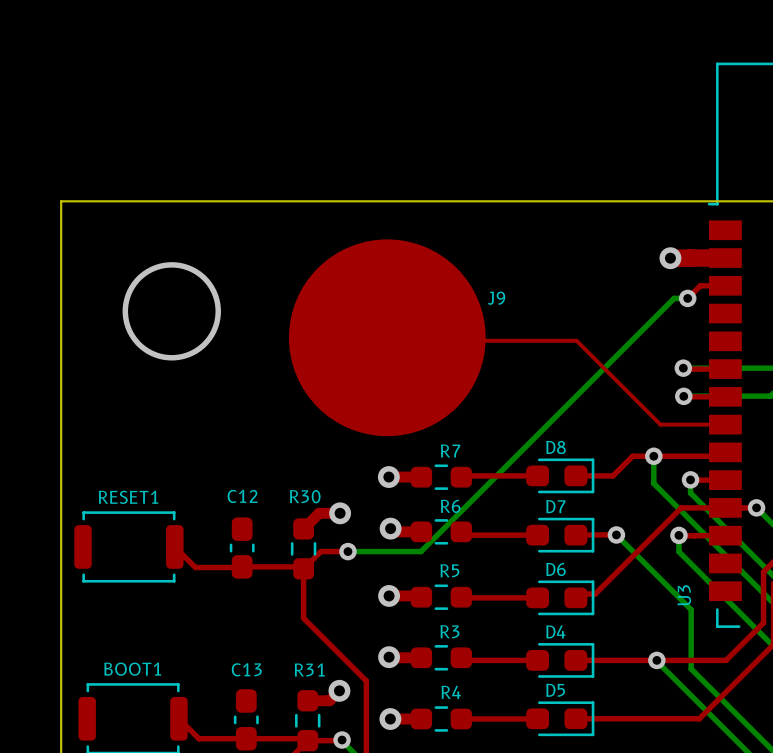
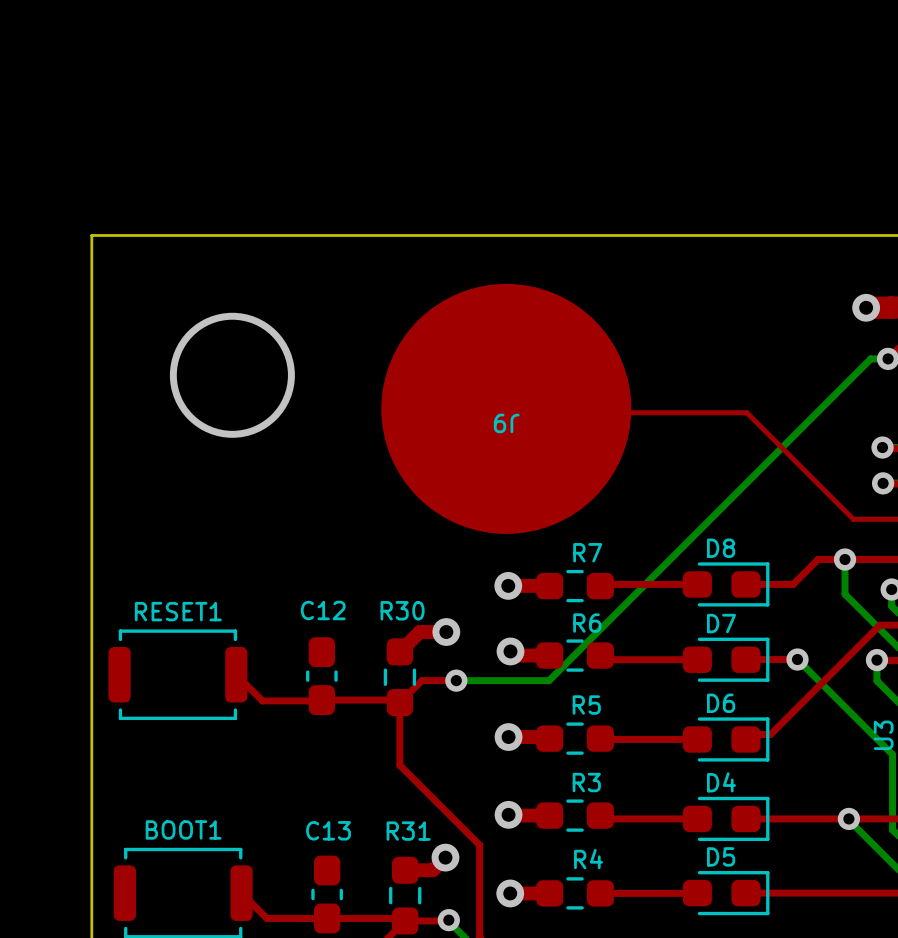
J9 name rotation: 0° (496, 298) -> 180° (506, 423)
J9 name position: J9 (496, 298) -> J9 (506, 423)

